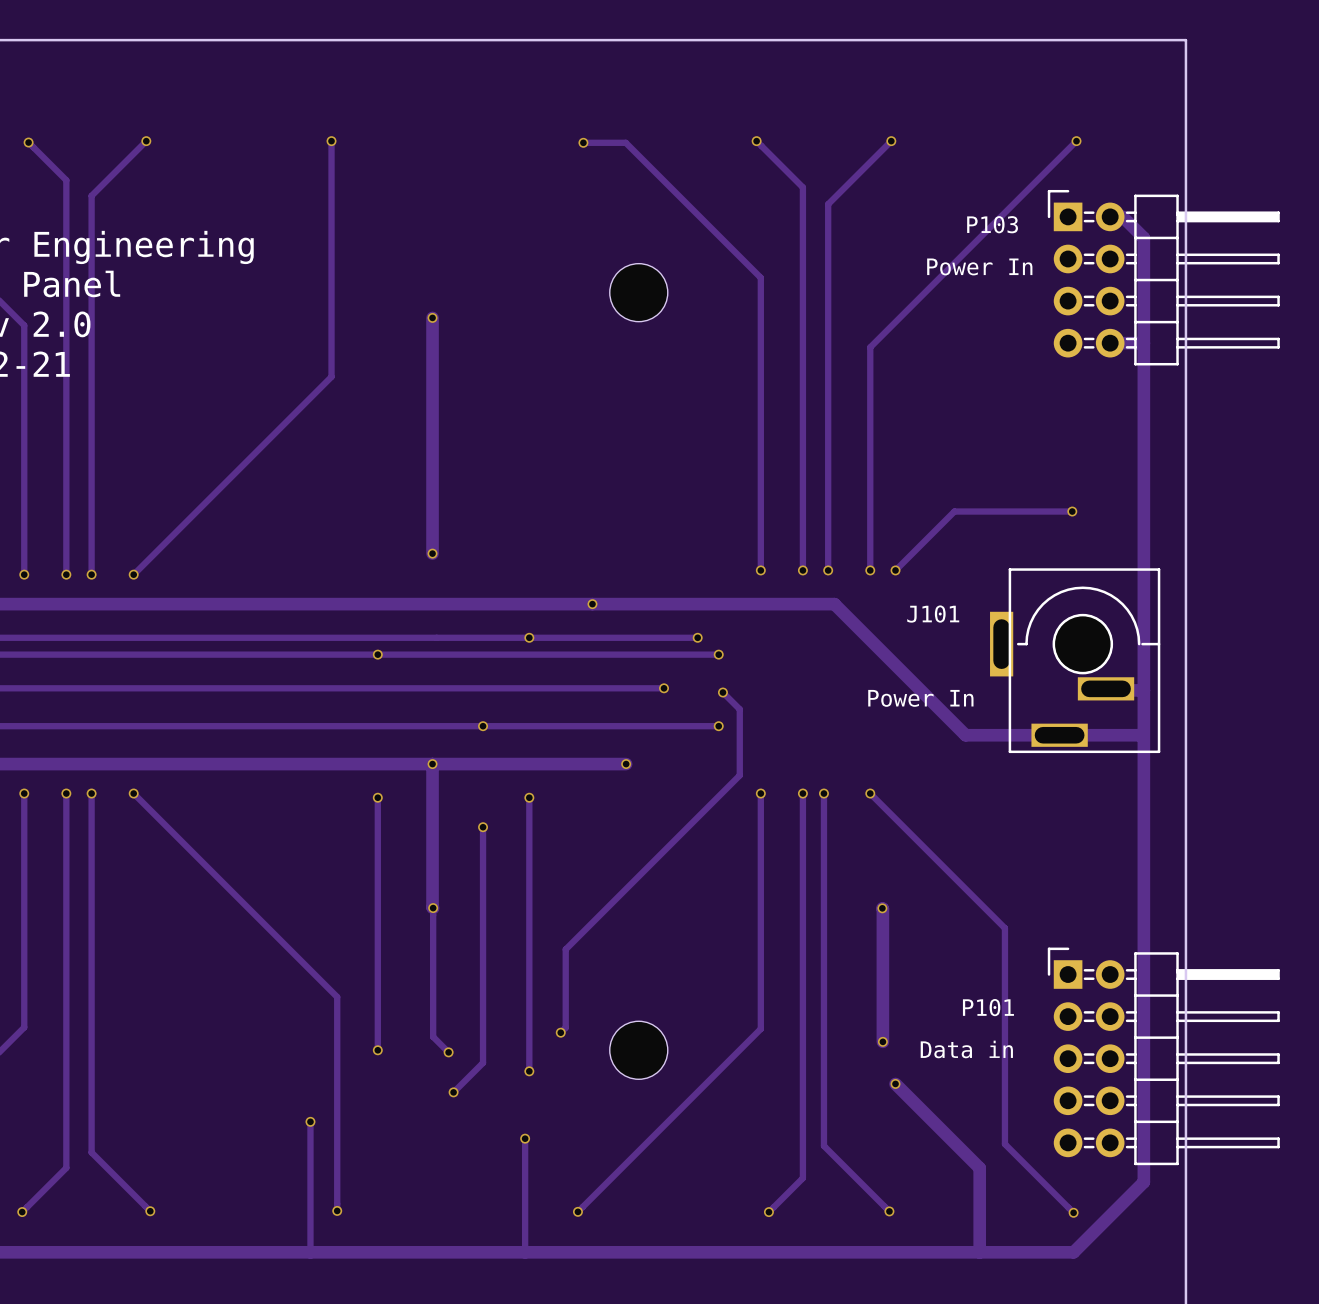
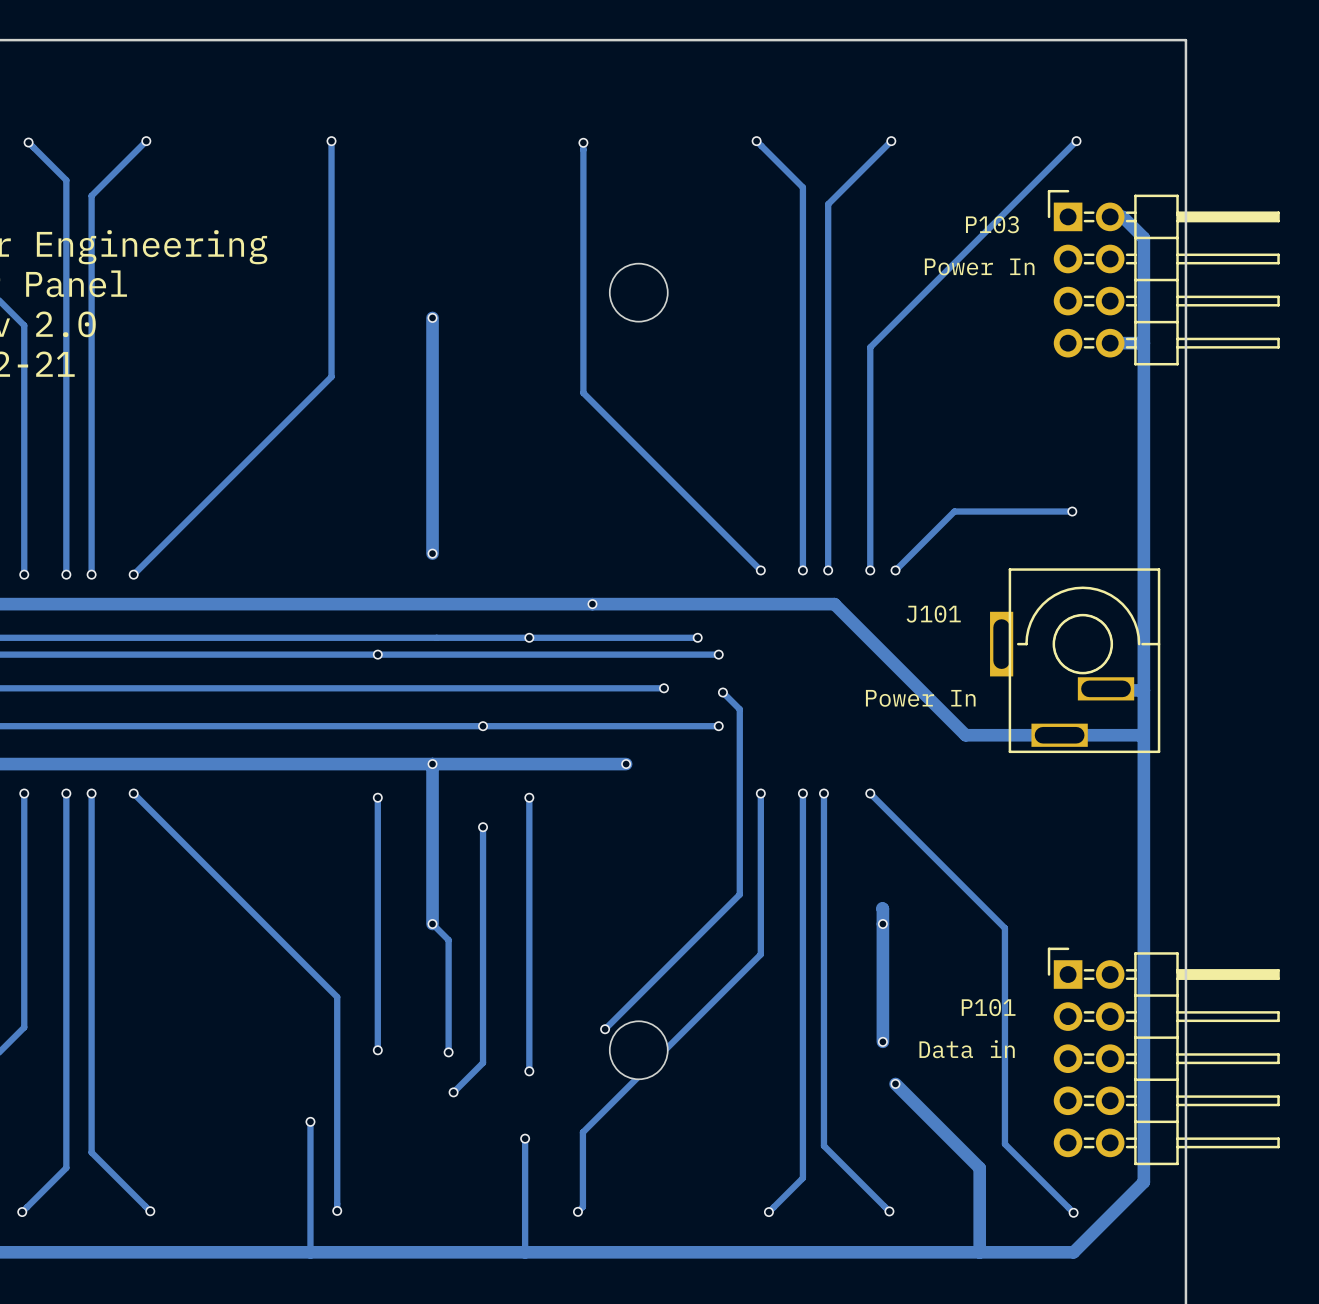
track: (583, 142) (625, 142) (760, 277) (760, 570) -> (583, 142) (583, 393) (760, 570)
track: (739, 775) (565, 949) (565, 1027) (560, 1032) -> (739, 775) (739, 894) (605, 1029)
track: (432, 907) (433, 1036) (448, 1052) -> (432, 907) (432, 924) (448, 940) (448, 1052)
via position: (433, 908) -> (432, 924)
via position: (882, 908) -> (882, 924)
track: (760, 954) (760, 1028) (582, 1206) -> (760, 954) (582, 1132) (582, 1206)
via position: (560, 1032) -> (605, 1029)

